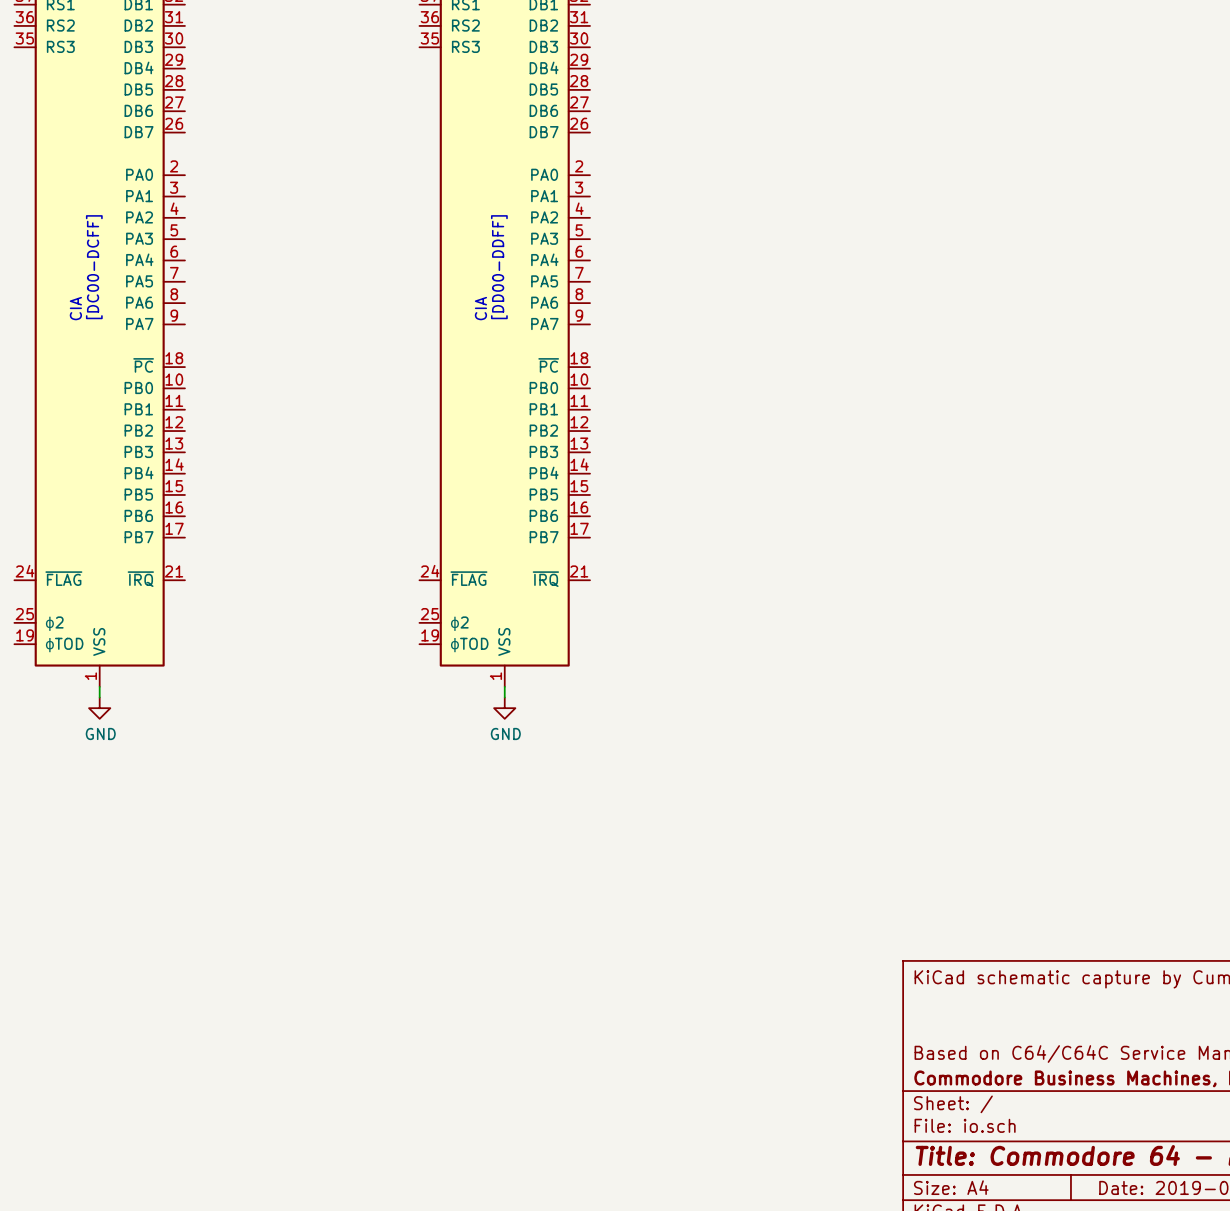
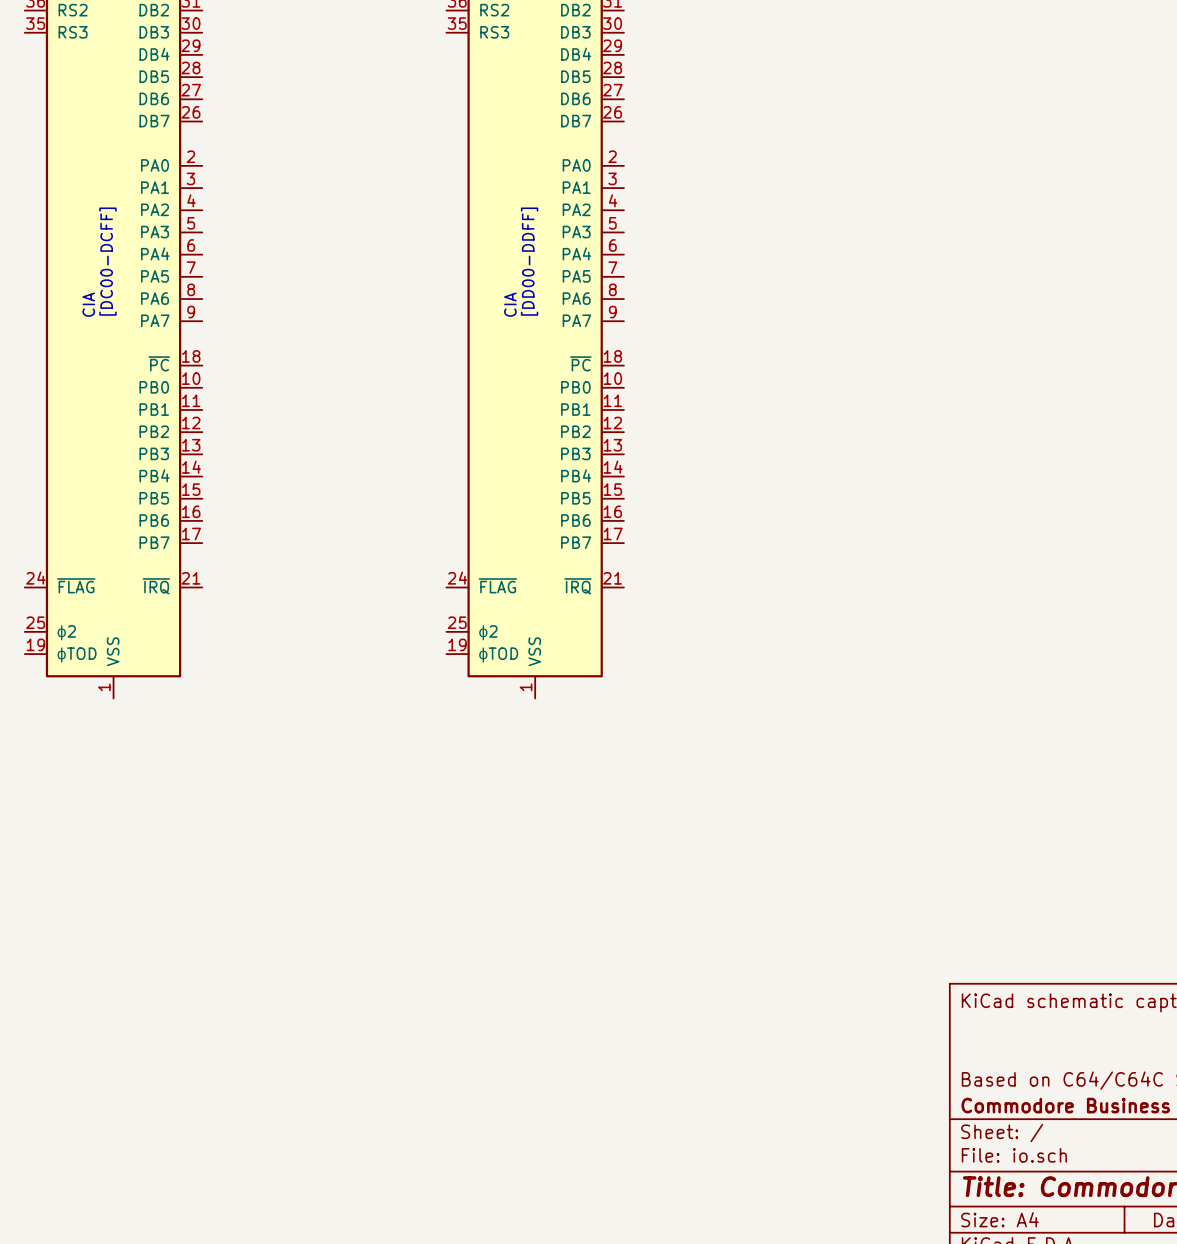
wire: (99, 686) (99, 697) -> none
wire: (504, 686) (504, 697) -> none
power symbol: GND (99, 708) -> none
power symbol: GND (504, 708) -> none

